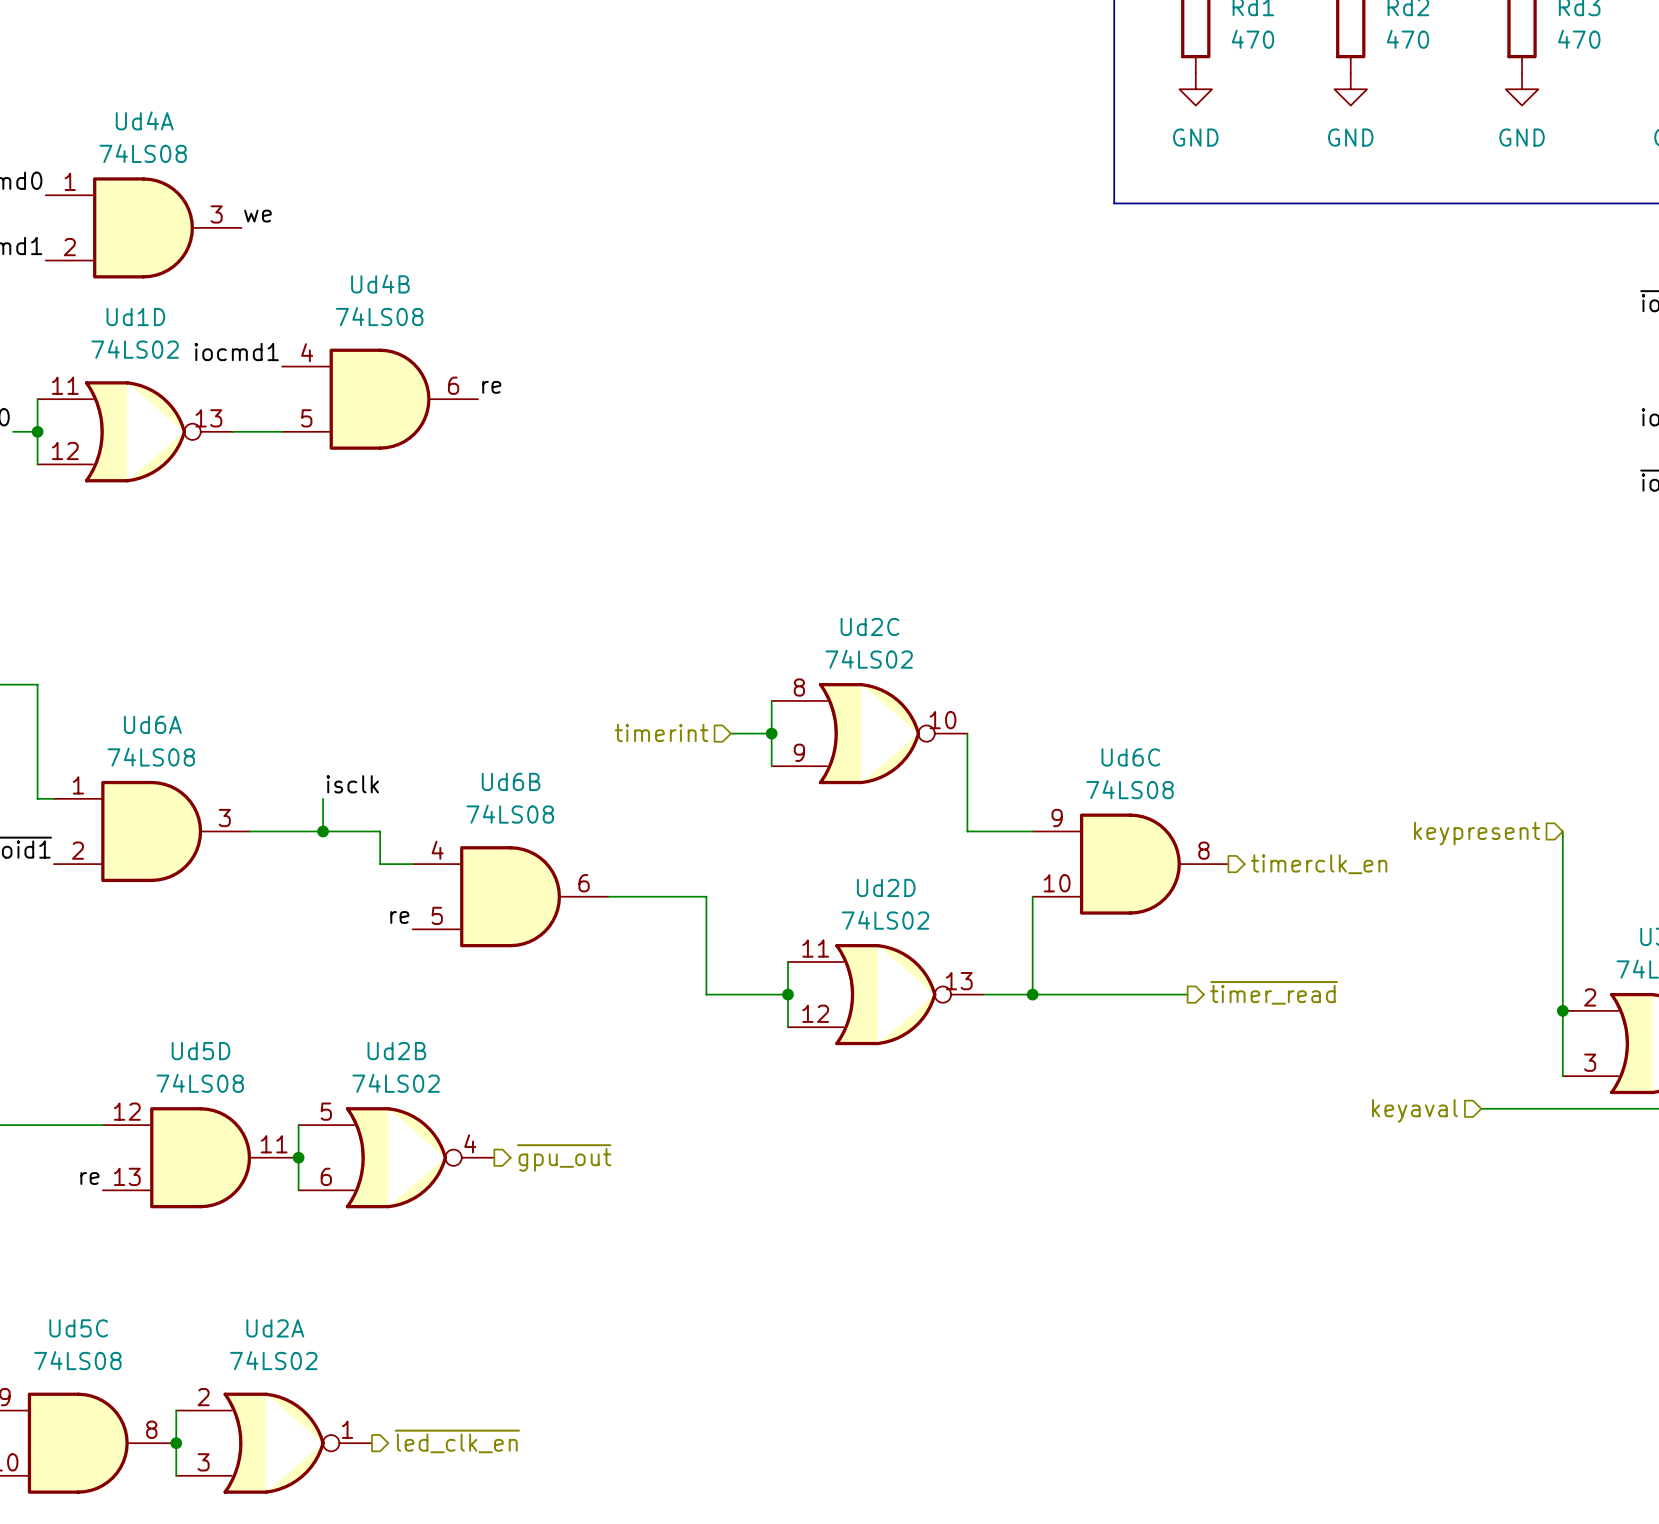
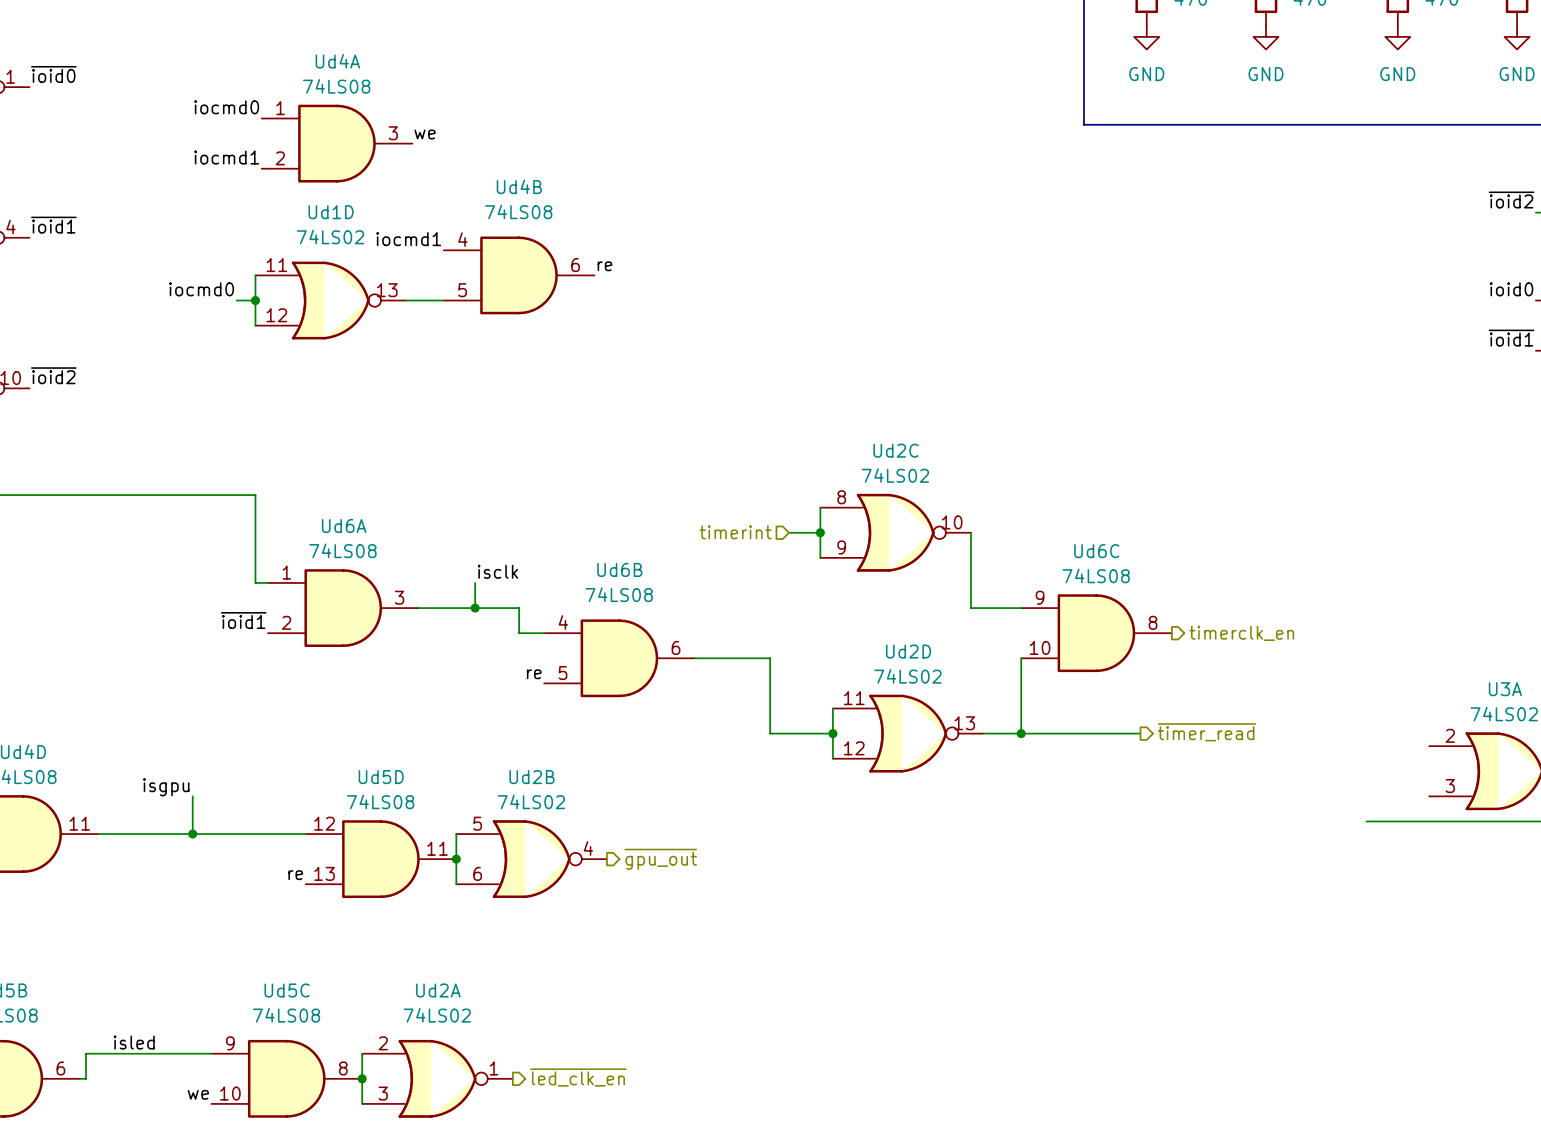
wire: (1562, 831) (1562, 1076) -> none
hierarchical label: keypresent (1477, 833) -> none
junction: (1562, 1010) -> none
hierarchical label: keyaval (1414, 1110) -> none

